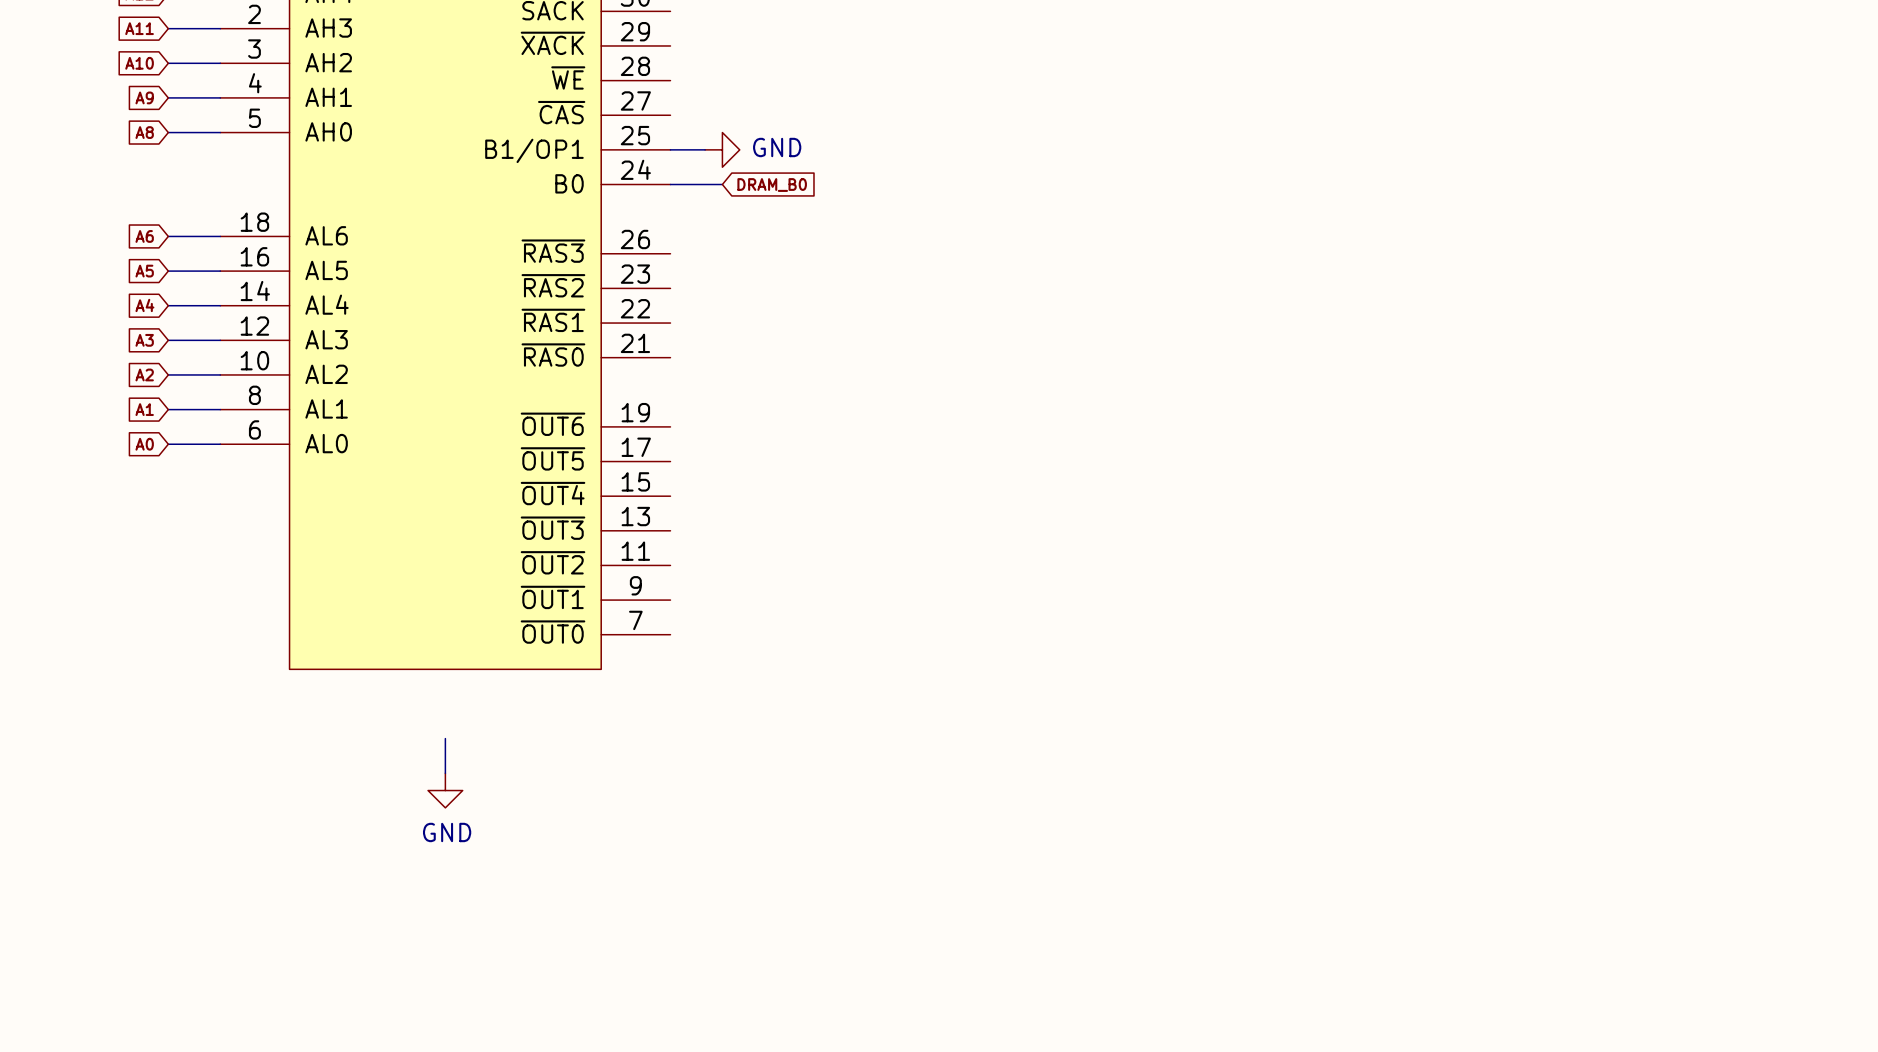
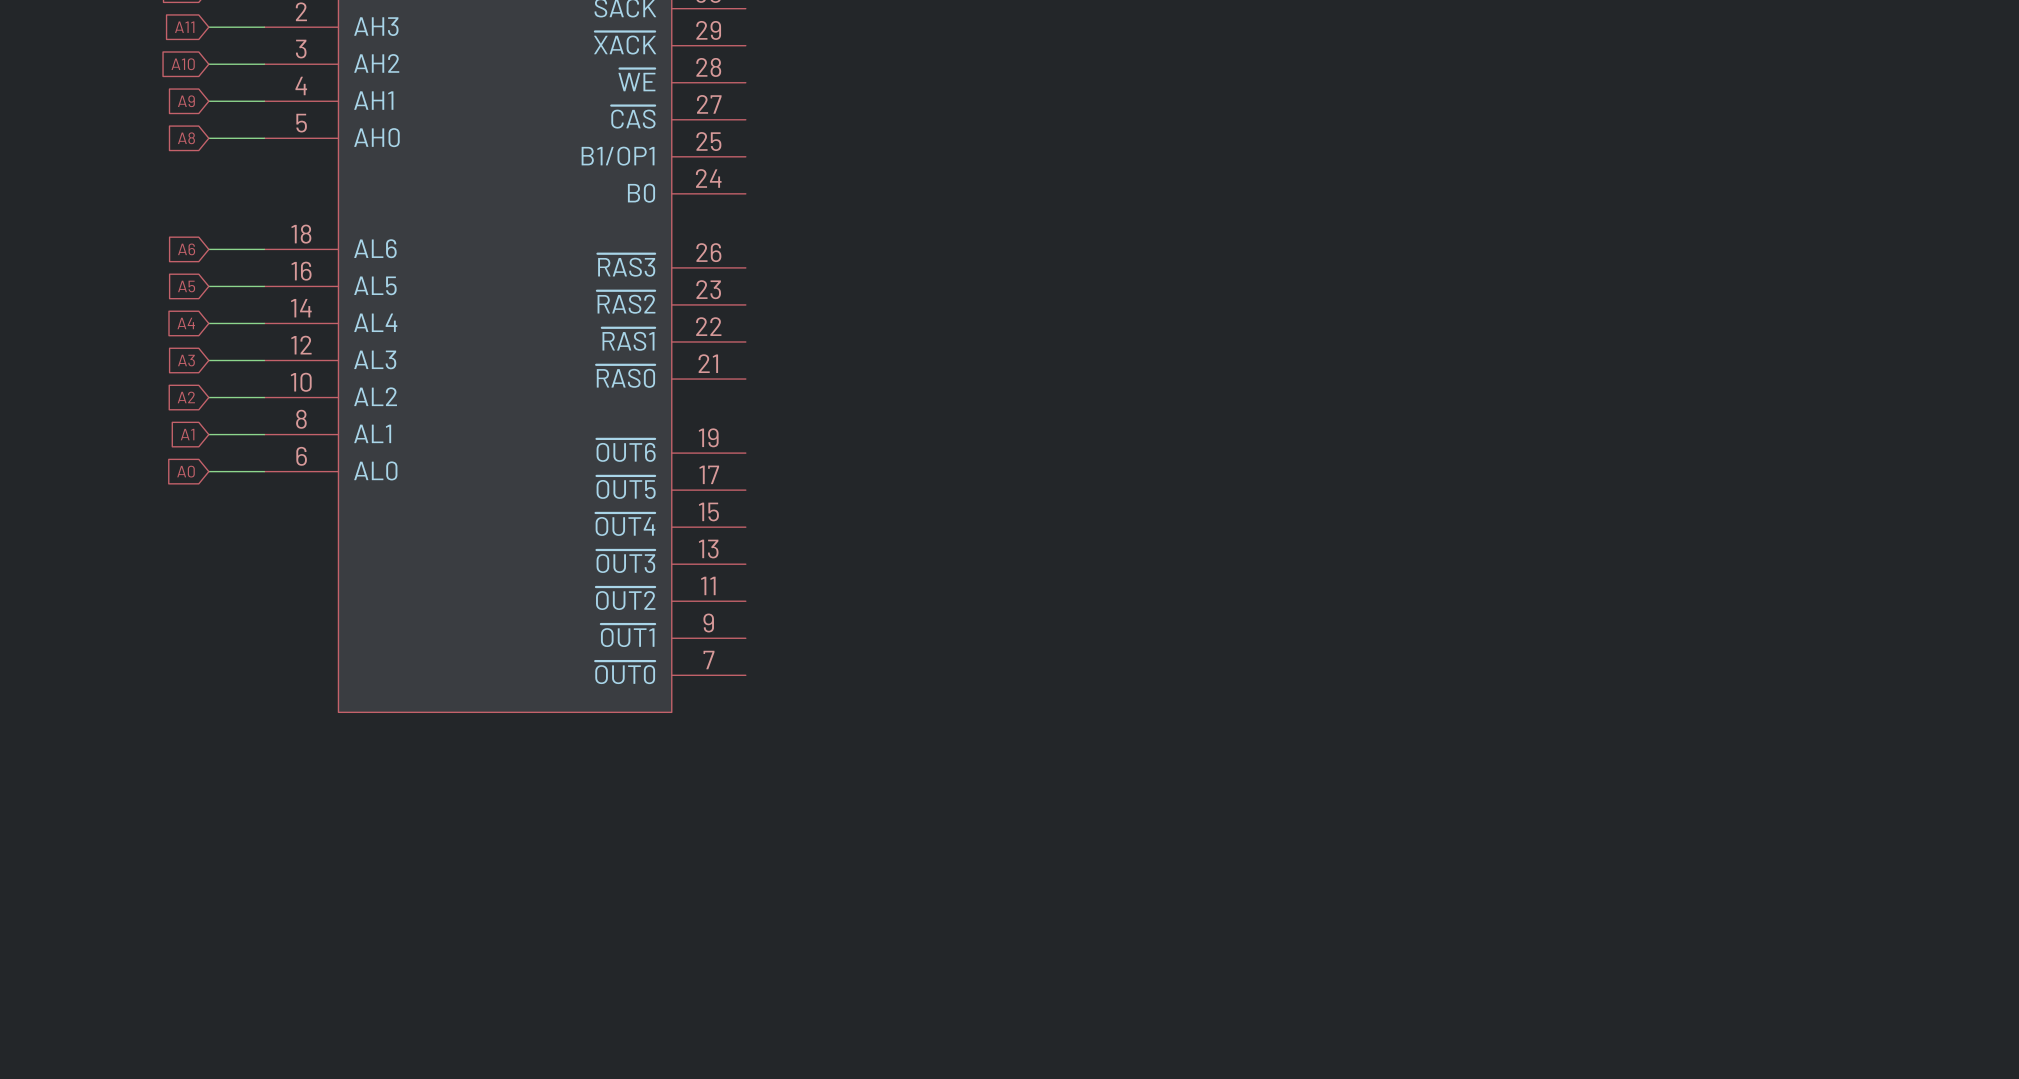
wire: (670, 149) (705, 149) -> none
power symbol: GND (722, 149) -> none
wire: (670, 184) (722, 184) -> none
global label: DRAM_B0 (772, 185) -> none
wire: (445, 738) (445, 773) -> none
power symbol: GND (445, 790) -> none

